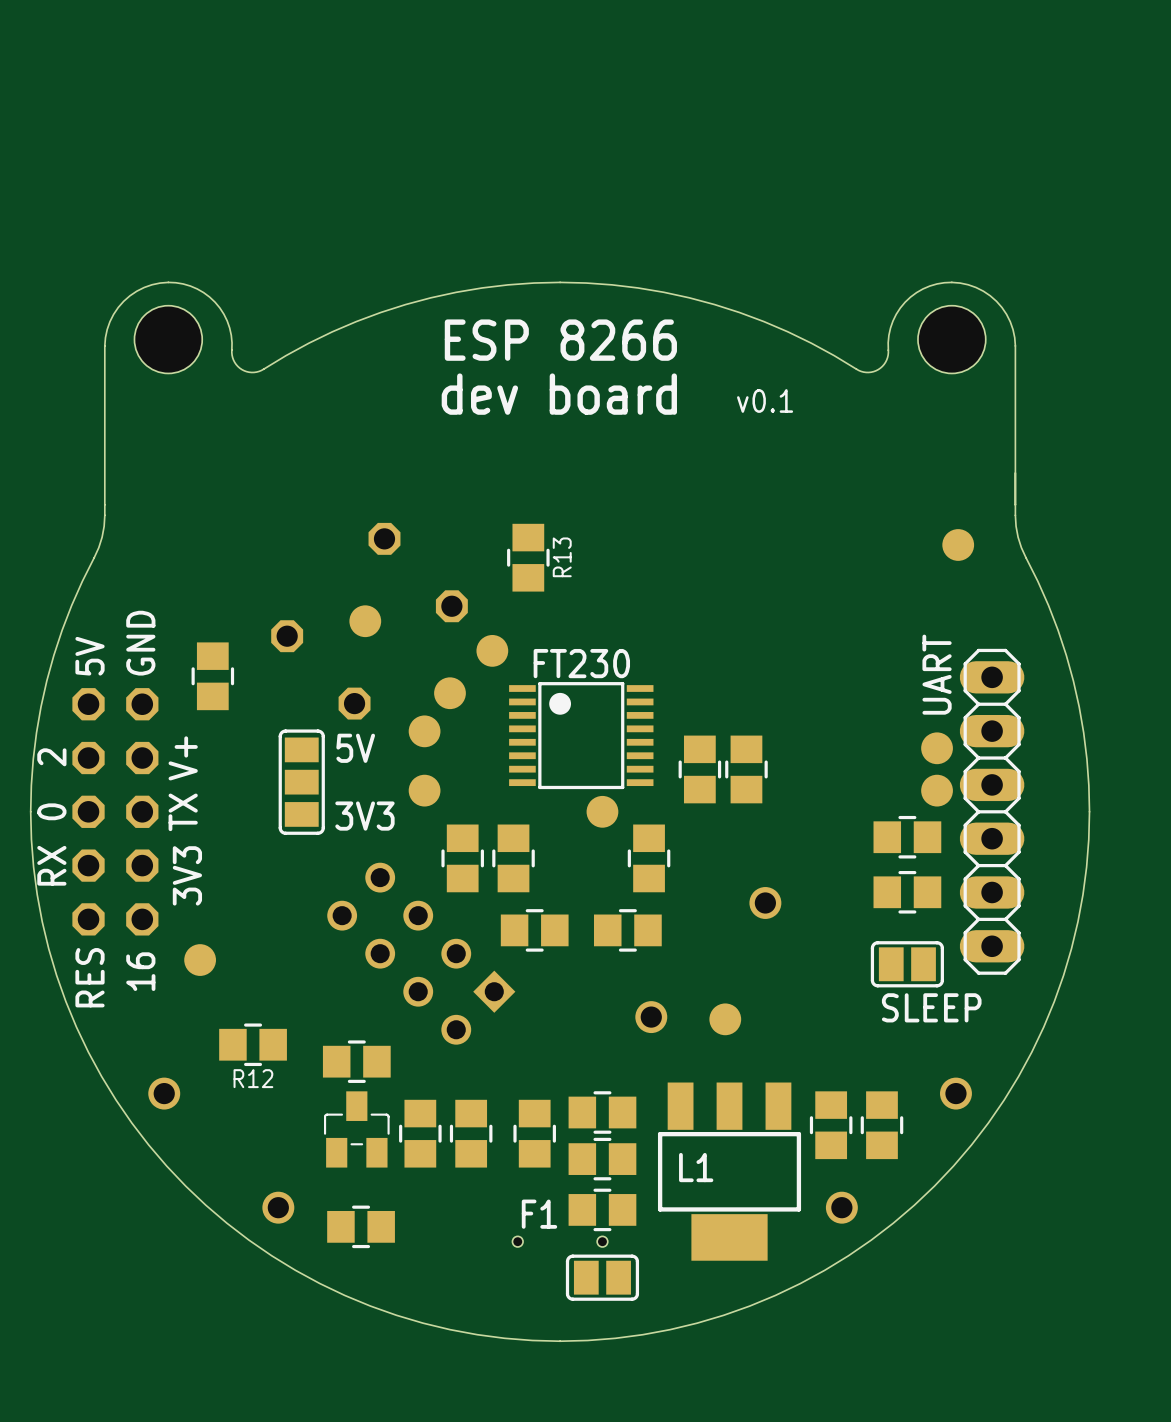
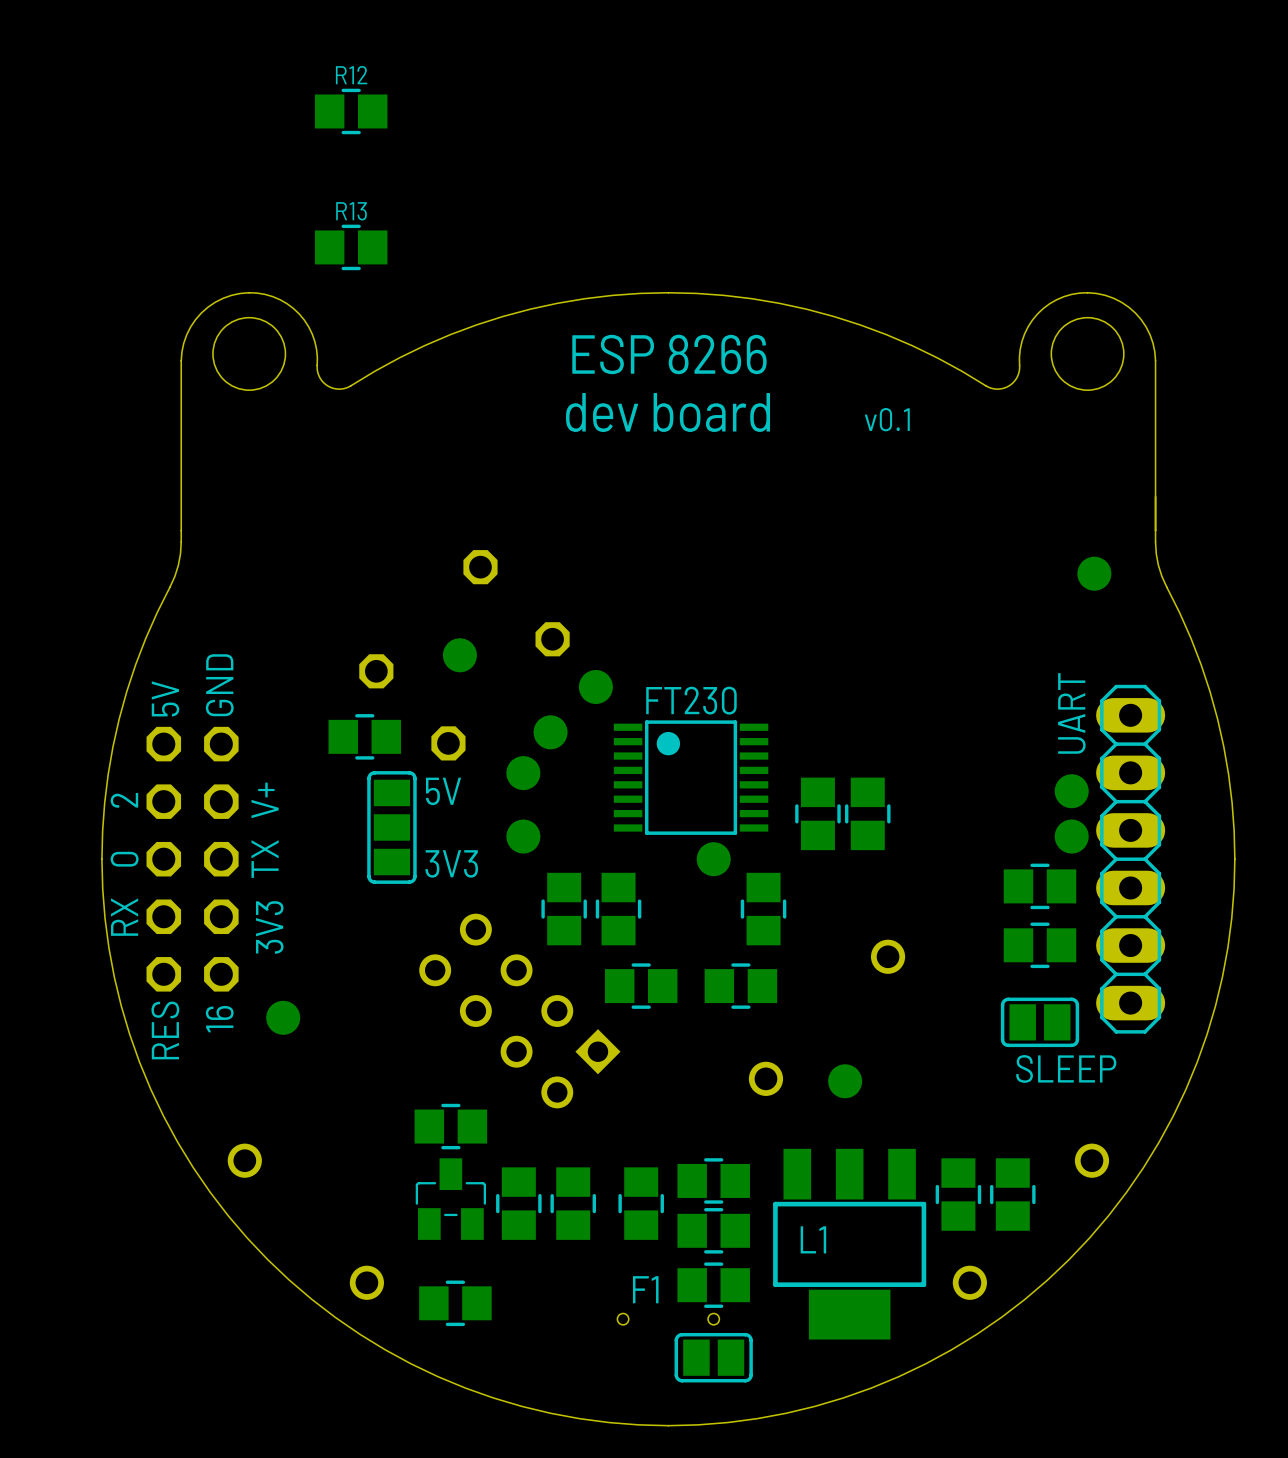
R13 rotation: 0° (528, 557) -> 90° clockwise (351, 247)
R13 position: (528, 557) -> (351, 247)
R13 name position: R13 (562, 557) -> R13 (351, 211)
part rotation: 0° (212, 676) -> 90° clockwise (364, 736)
part position: (212, 676) -> (364, 736)
R12 position: (253, 1044) -> (351, 111)
R12 name position: R12 (253, 1078) -> R12 (351, 75)

